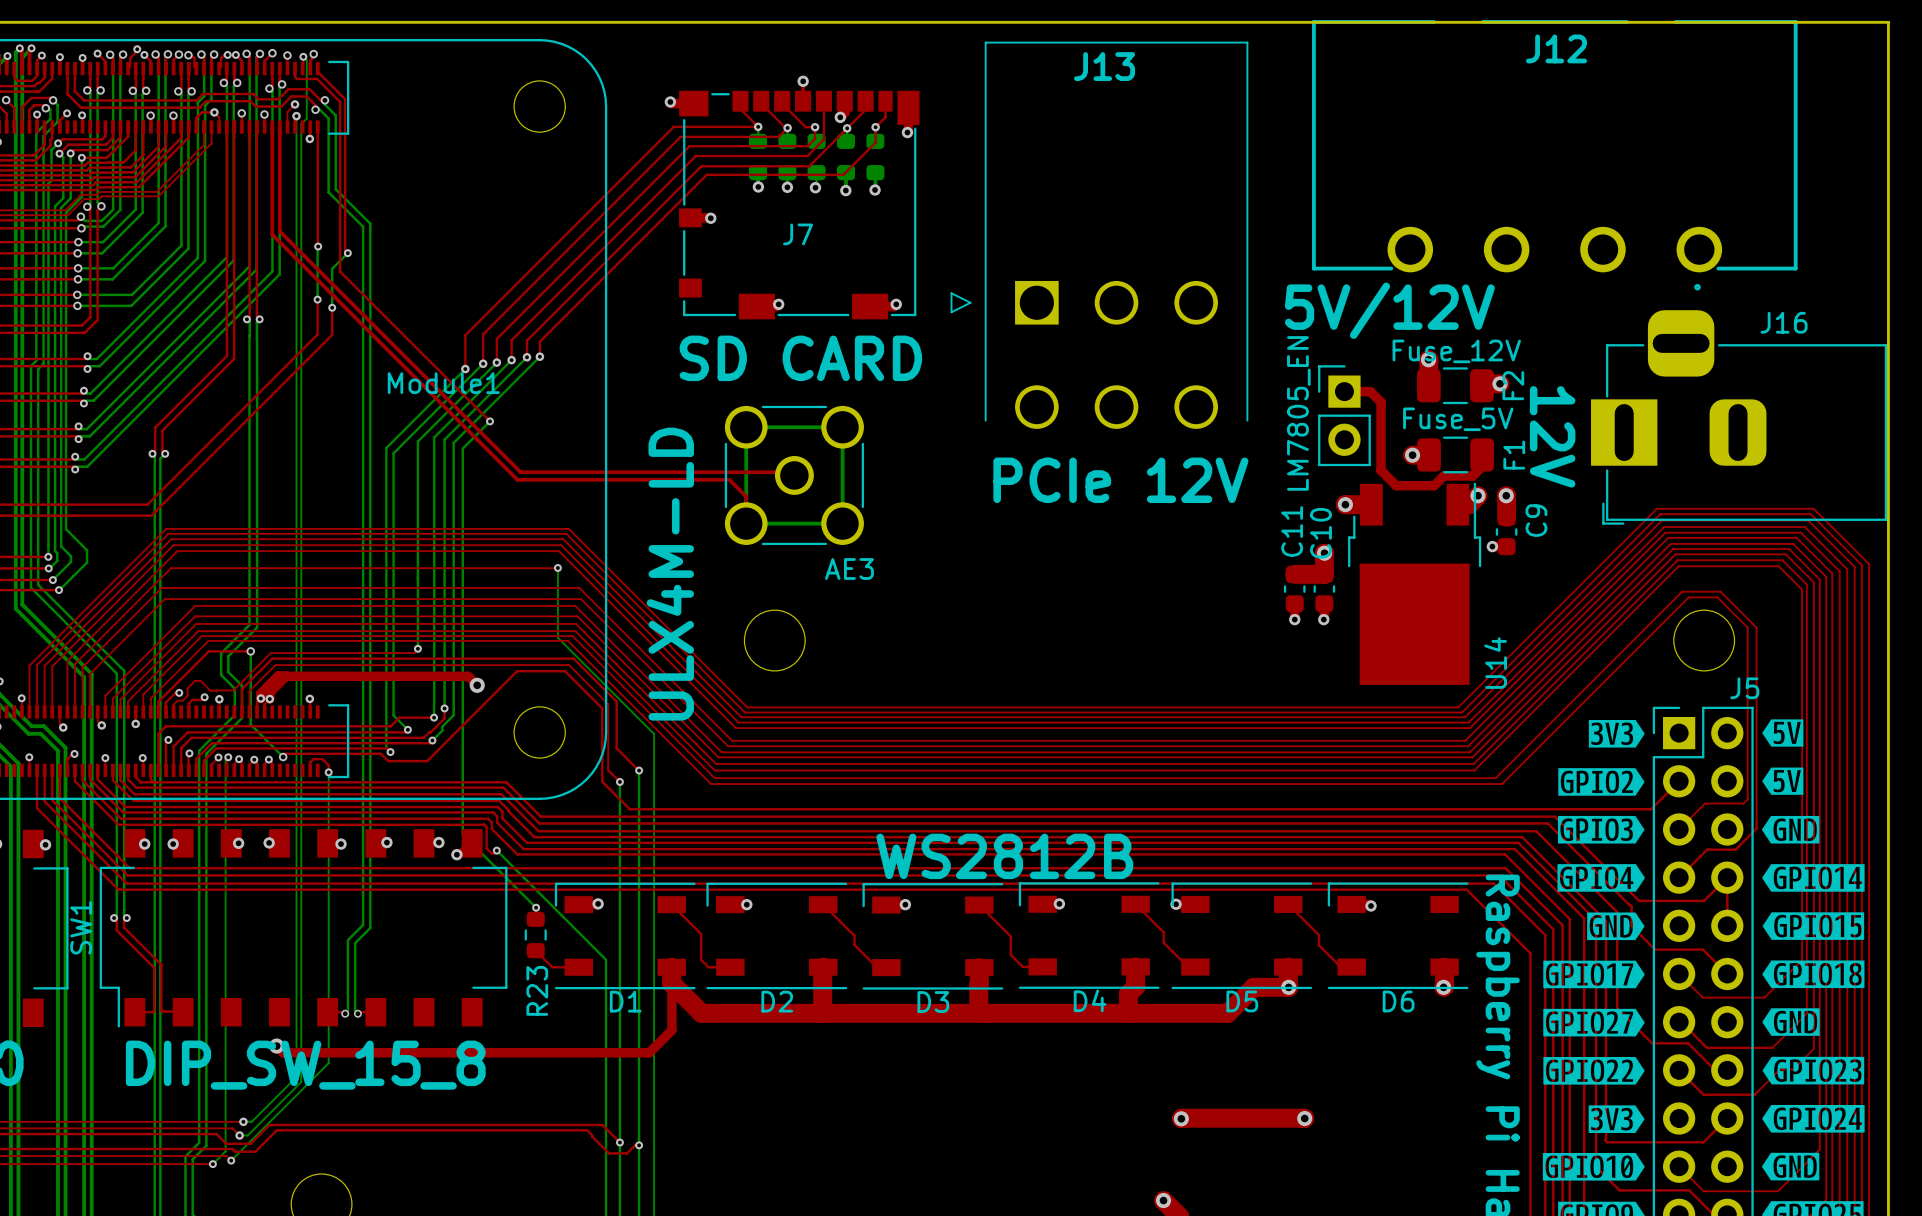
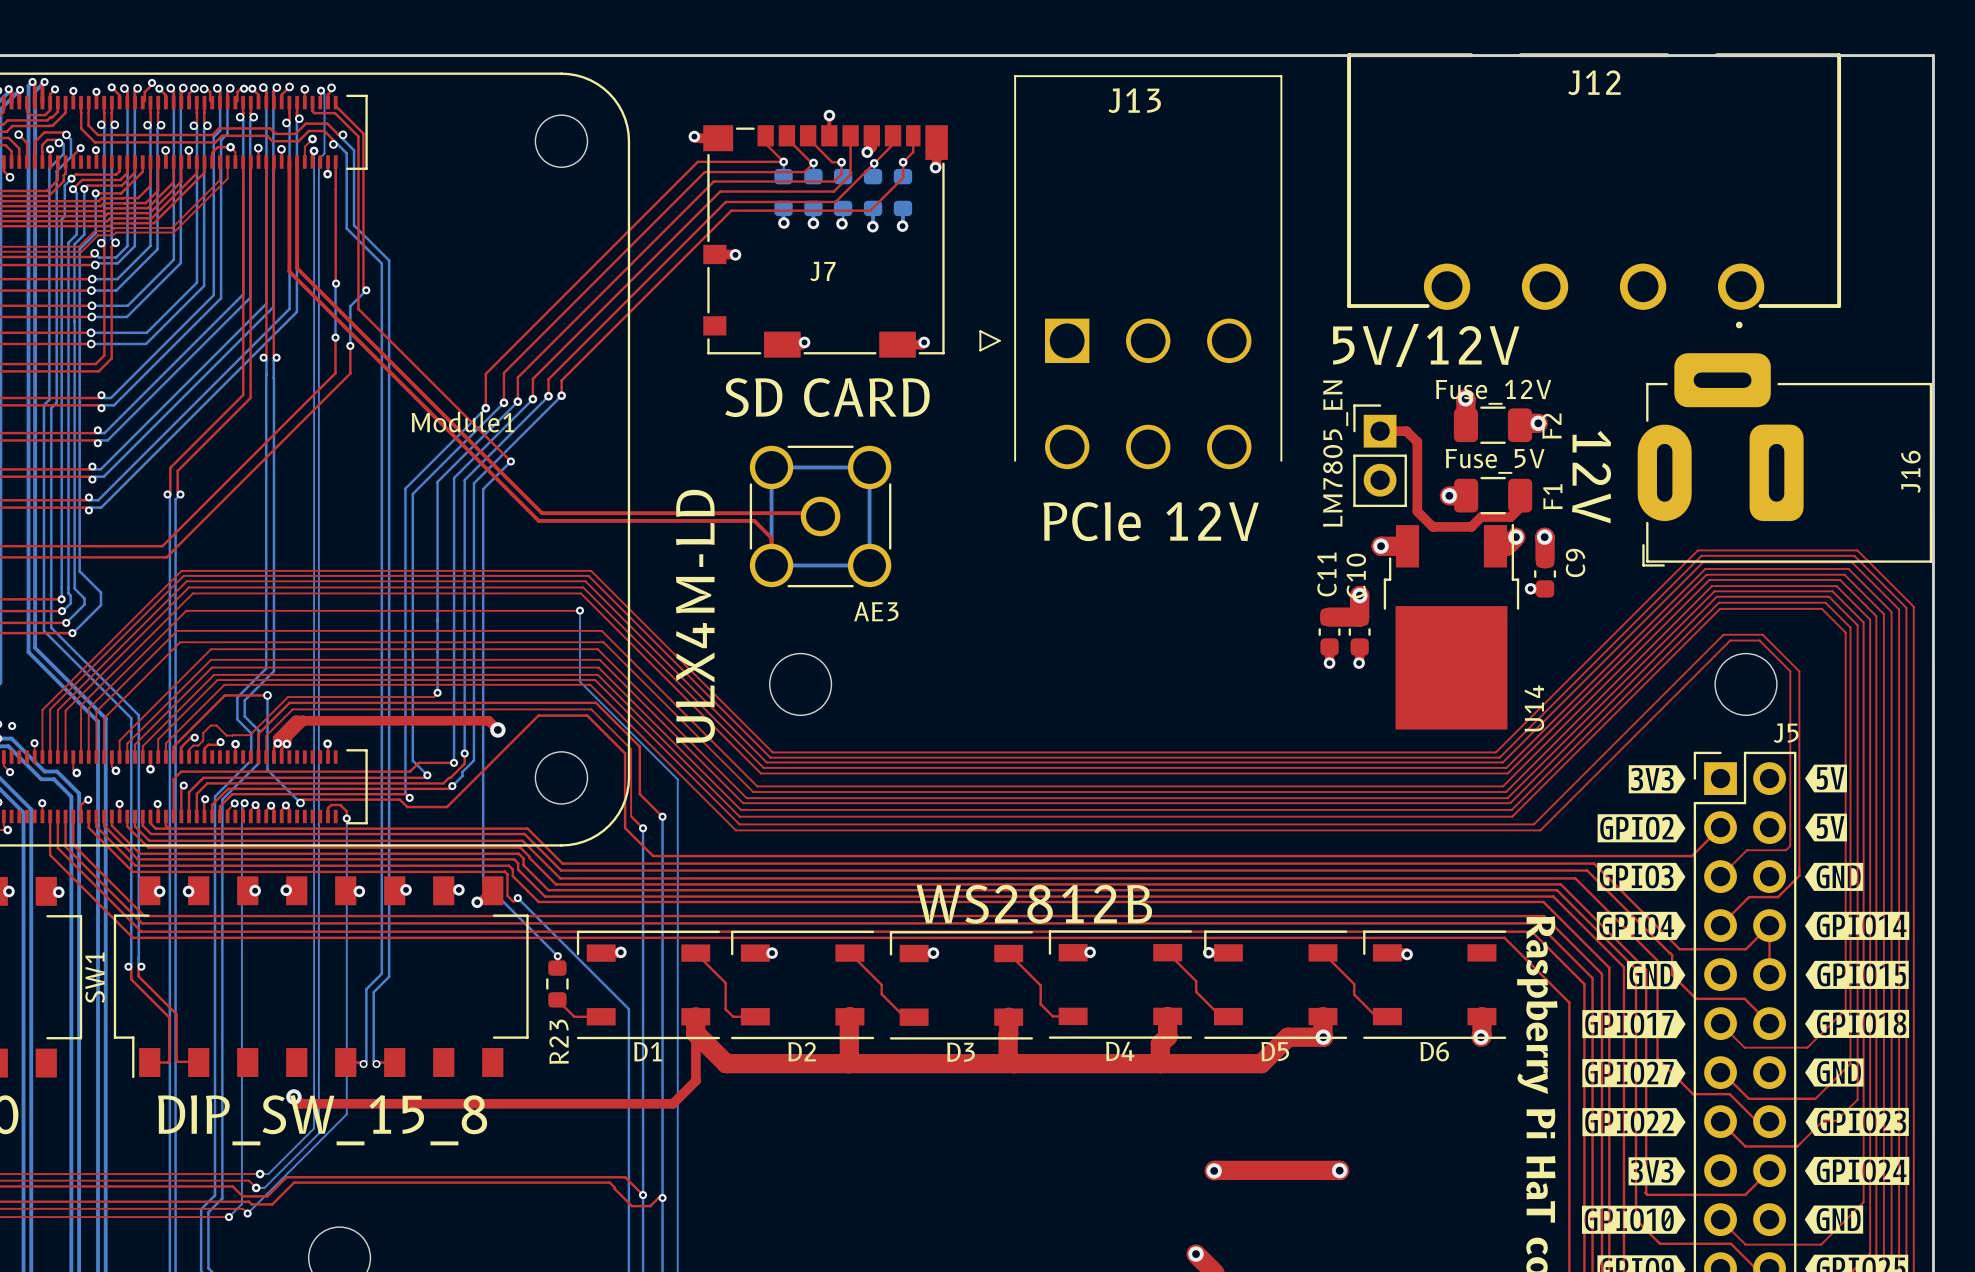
J16 footprint: [1591, 310, 1888, 525] -> [1637, 353, 1933, 567]
J16 name position: J16 (1784, 322) -> J16 (1910, 471)

